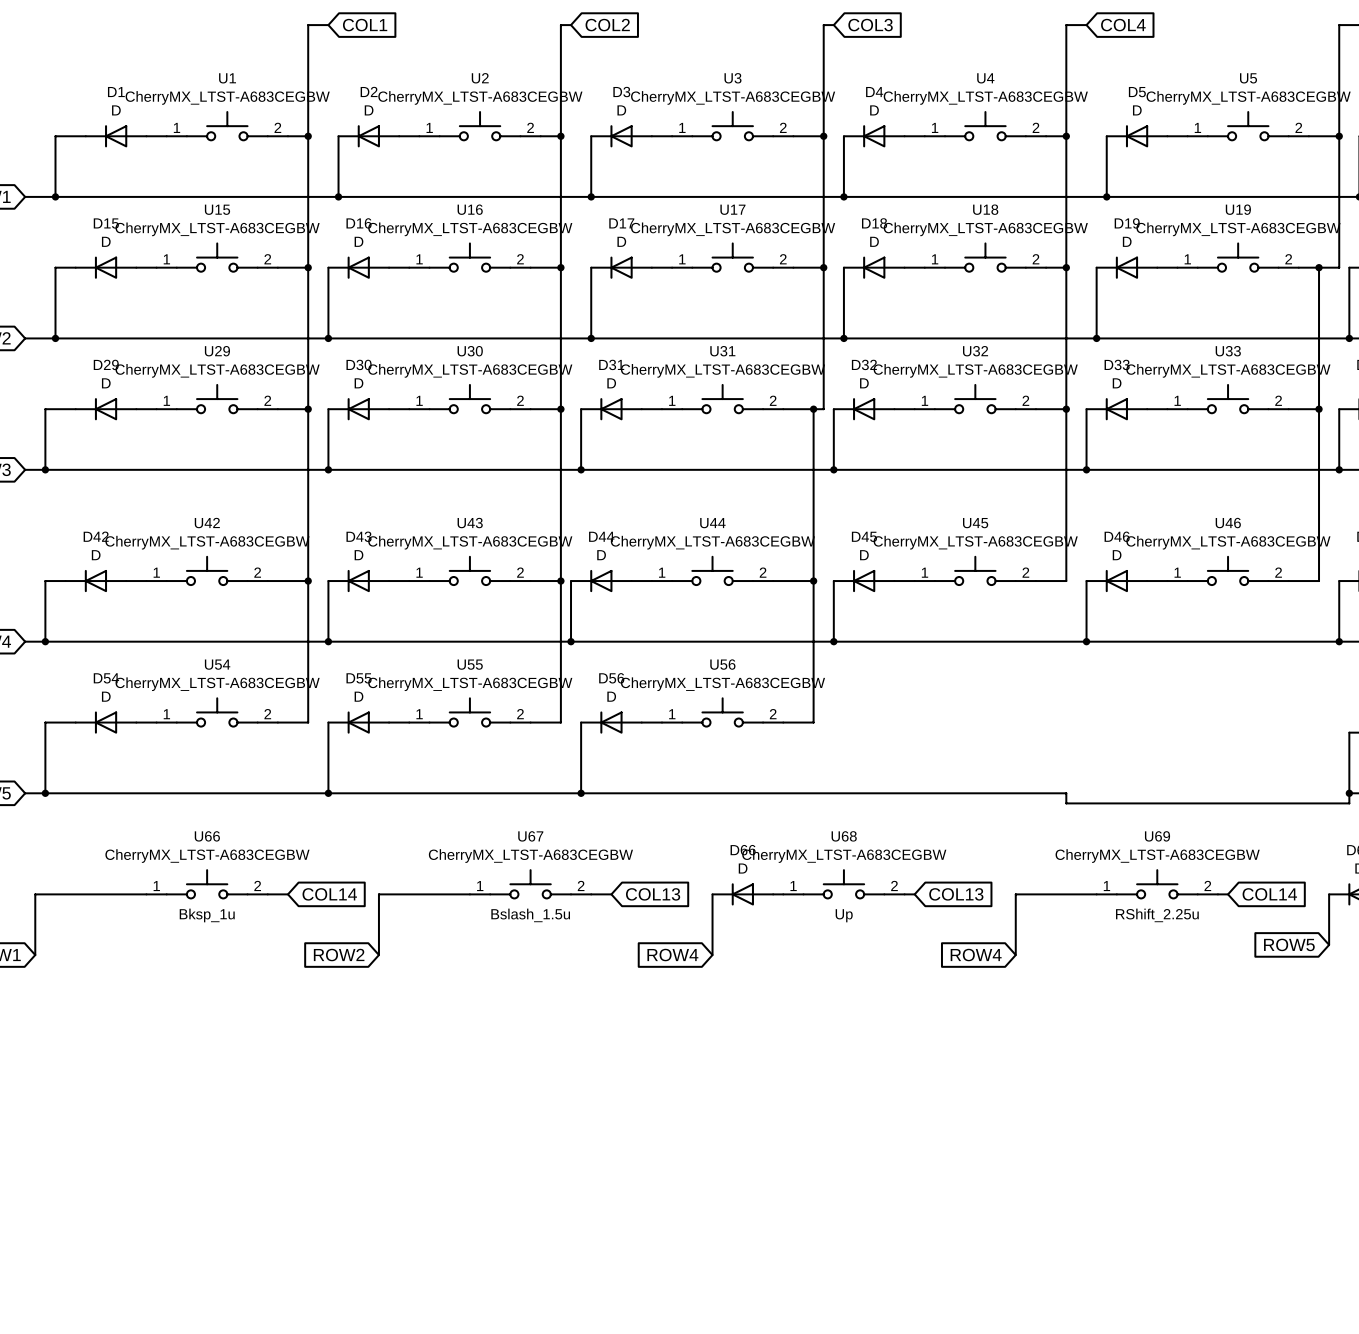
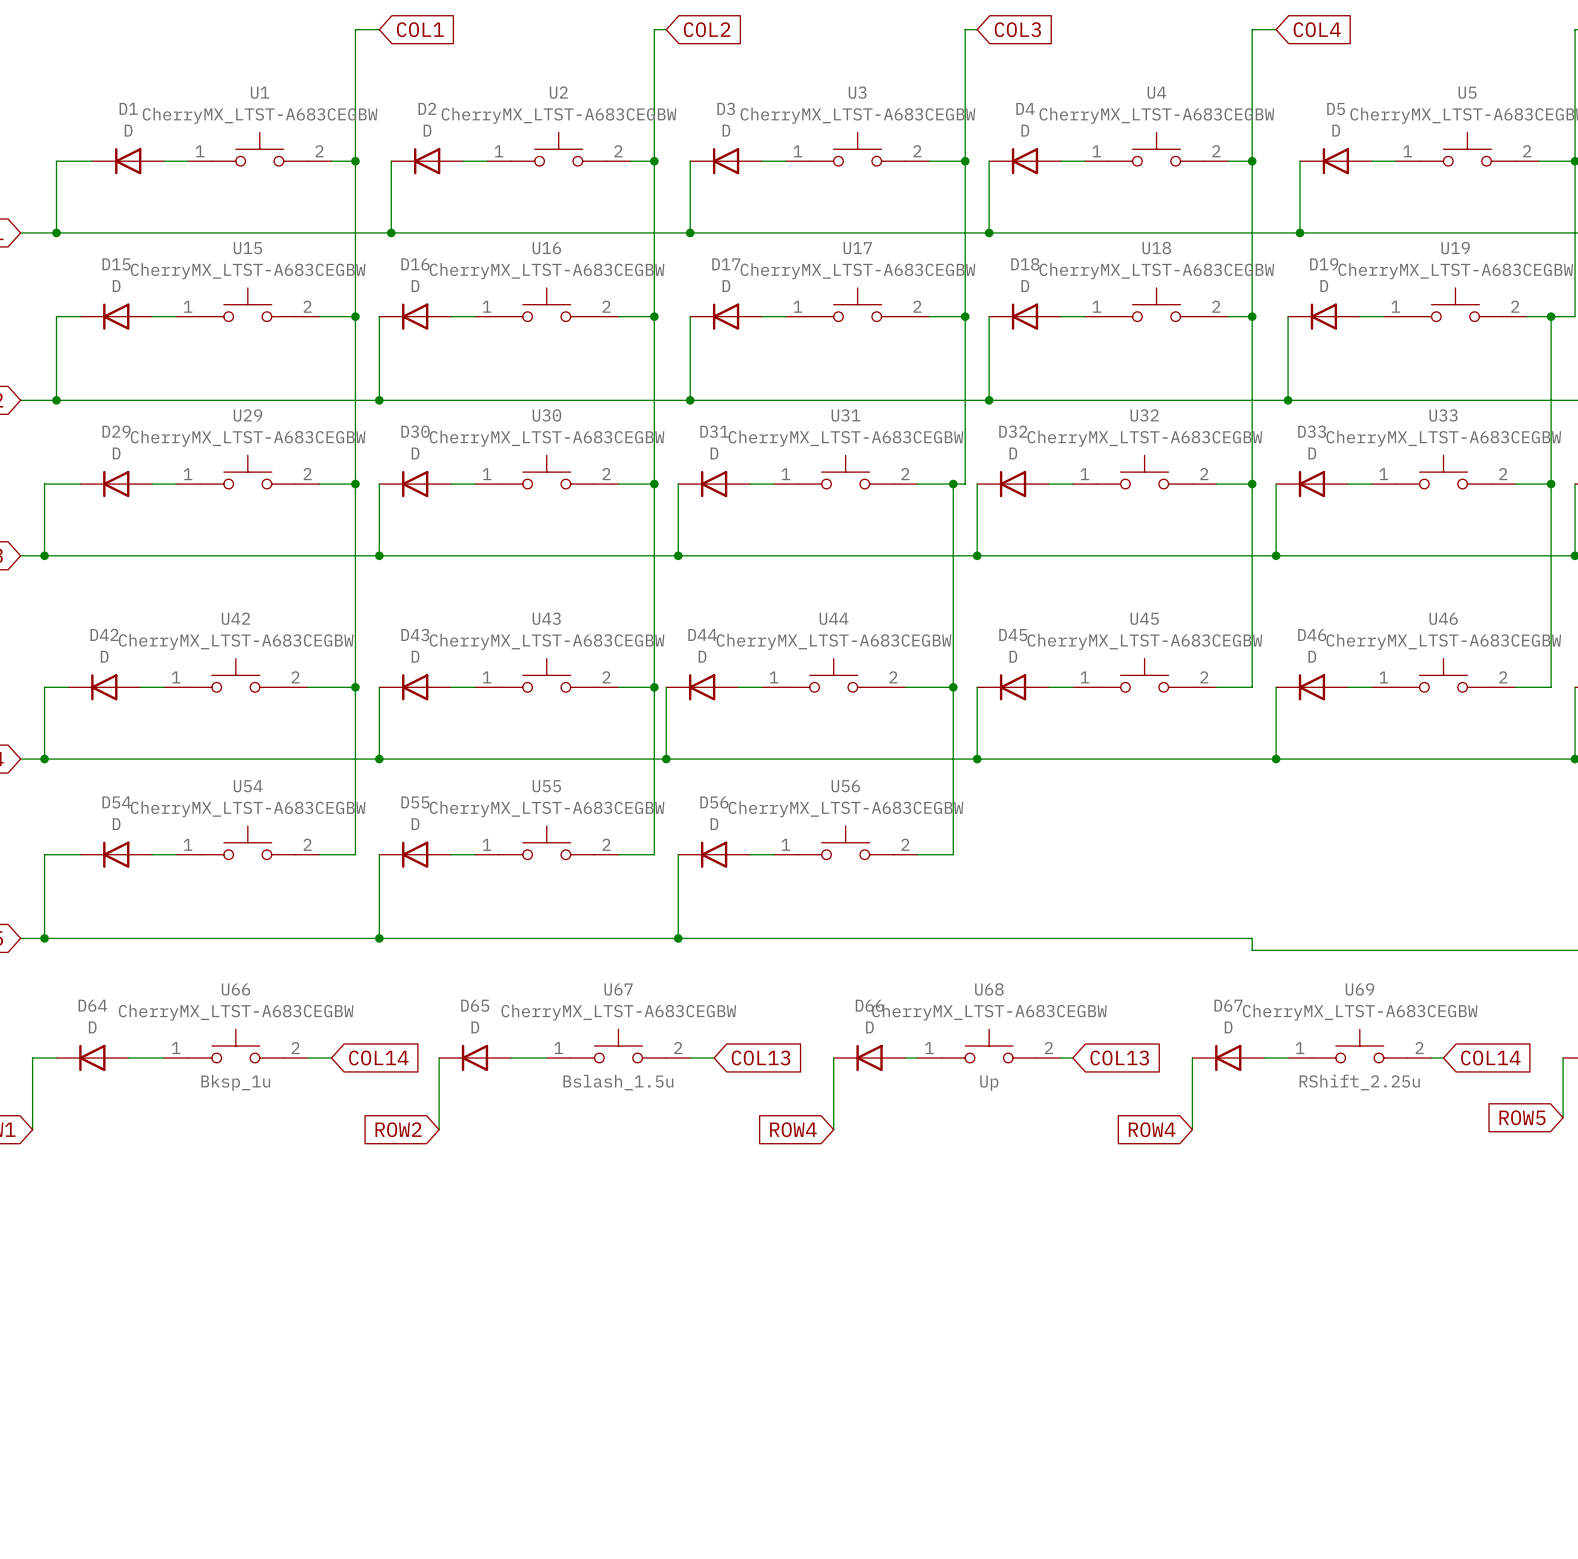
D64: none -> D (92, 1057)
D65: none -> D (474, 1057)
D67: none -> D (1228, 1057)

